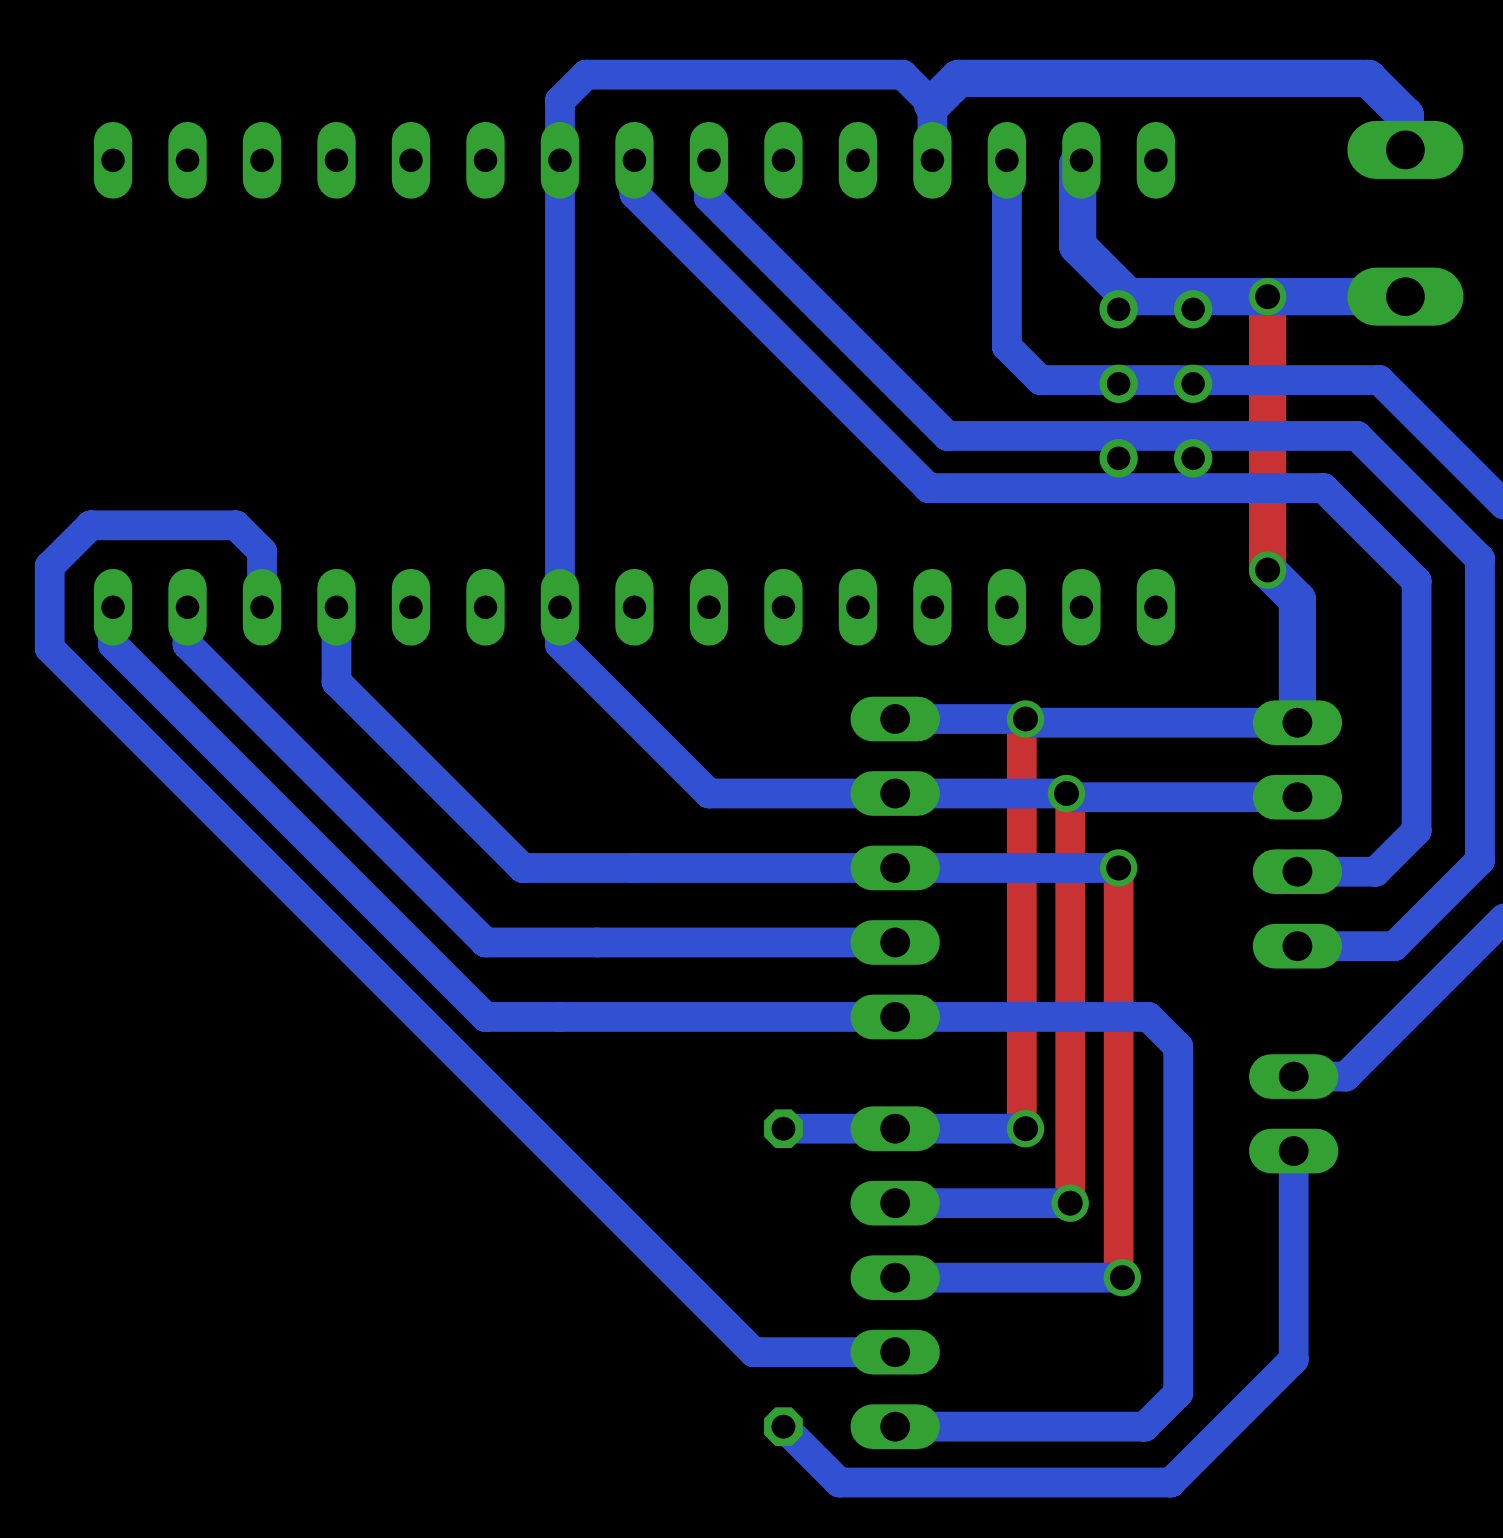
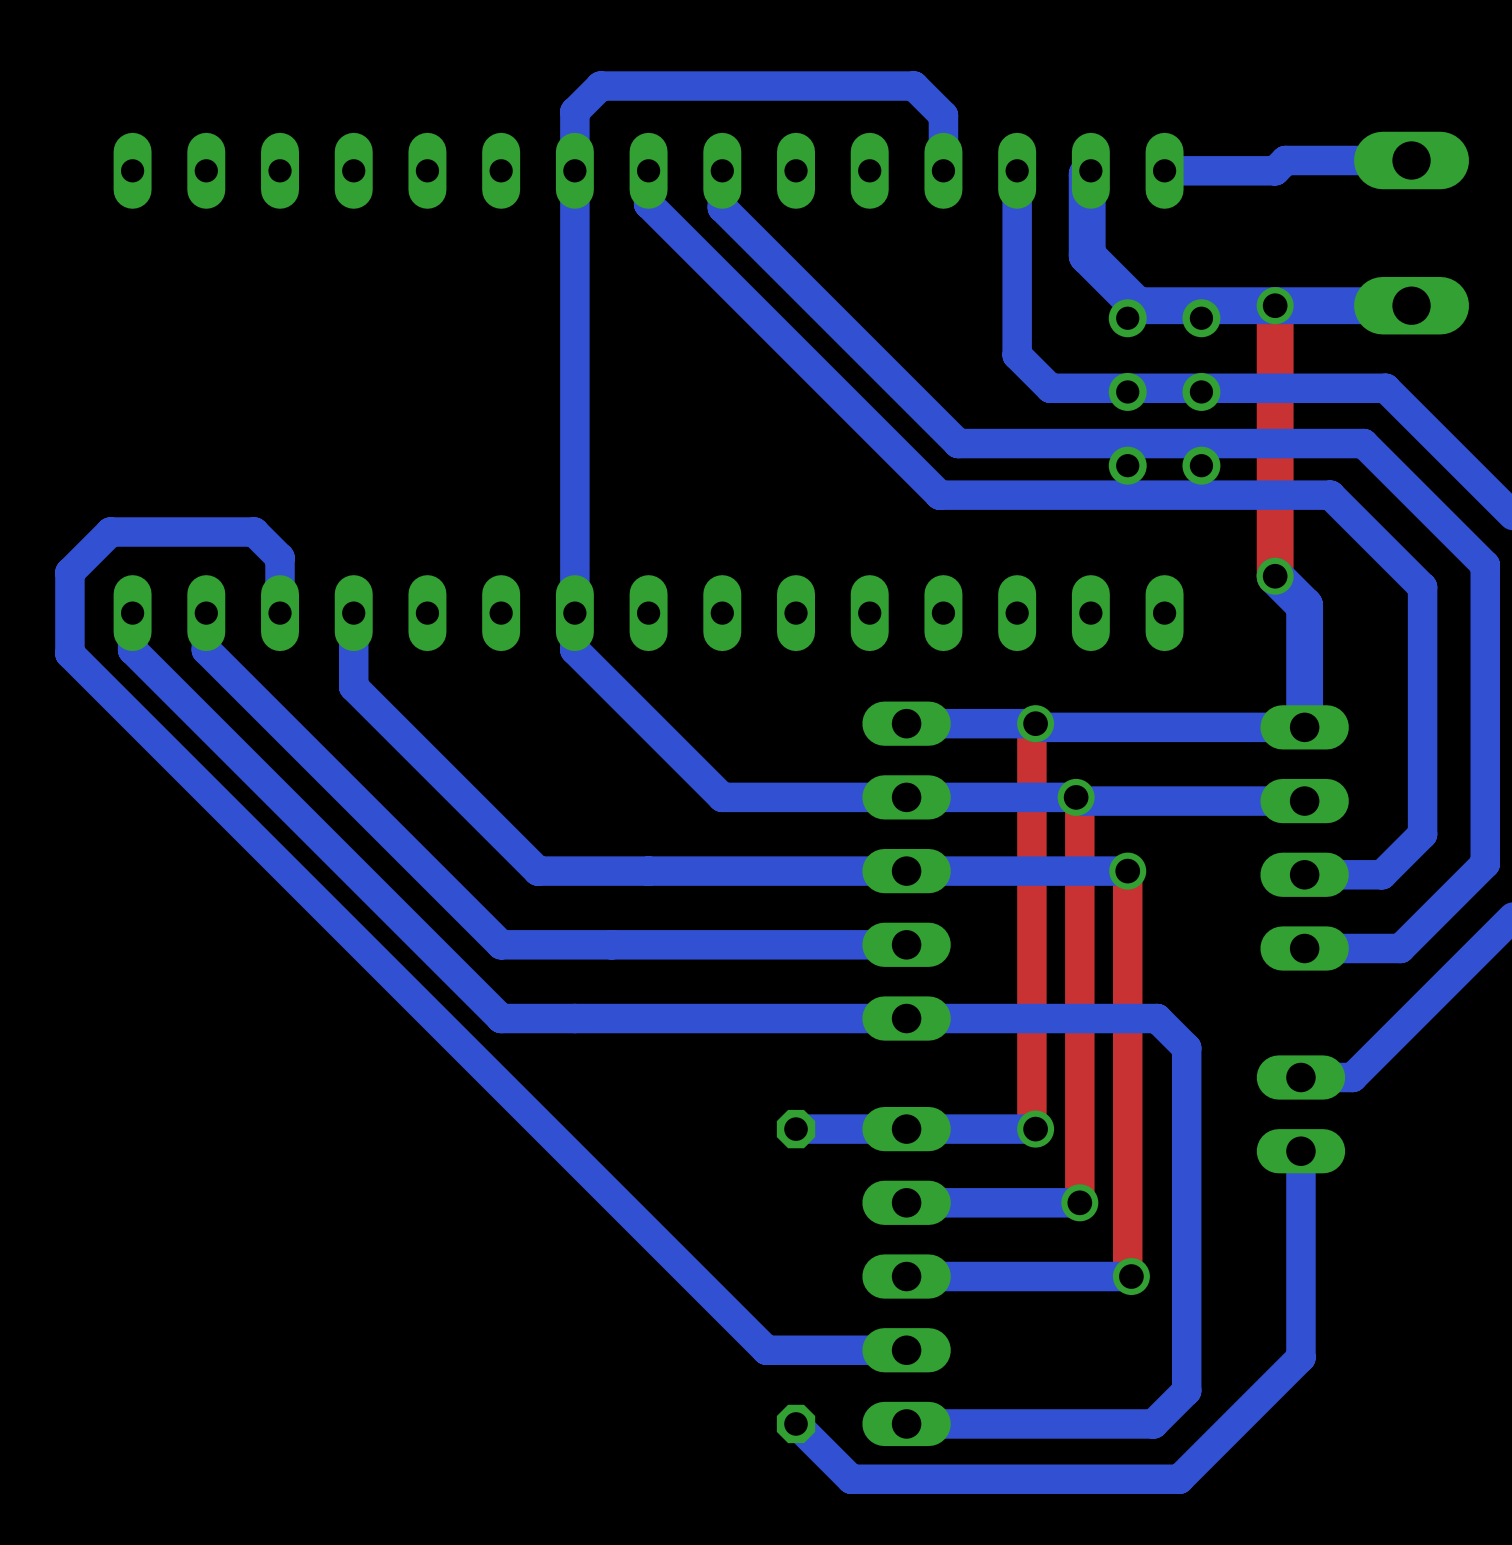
bottom track: (932, 104) (958, 78) (1368, 78) (1405, 115) (1405, 149) -> (1164, 170) (1275, 170) (1285, 160) (1411, 160)

